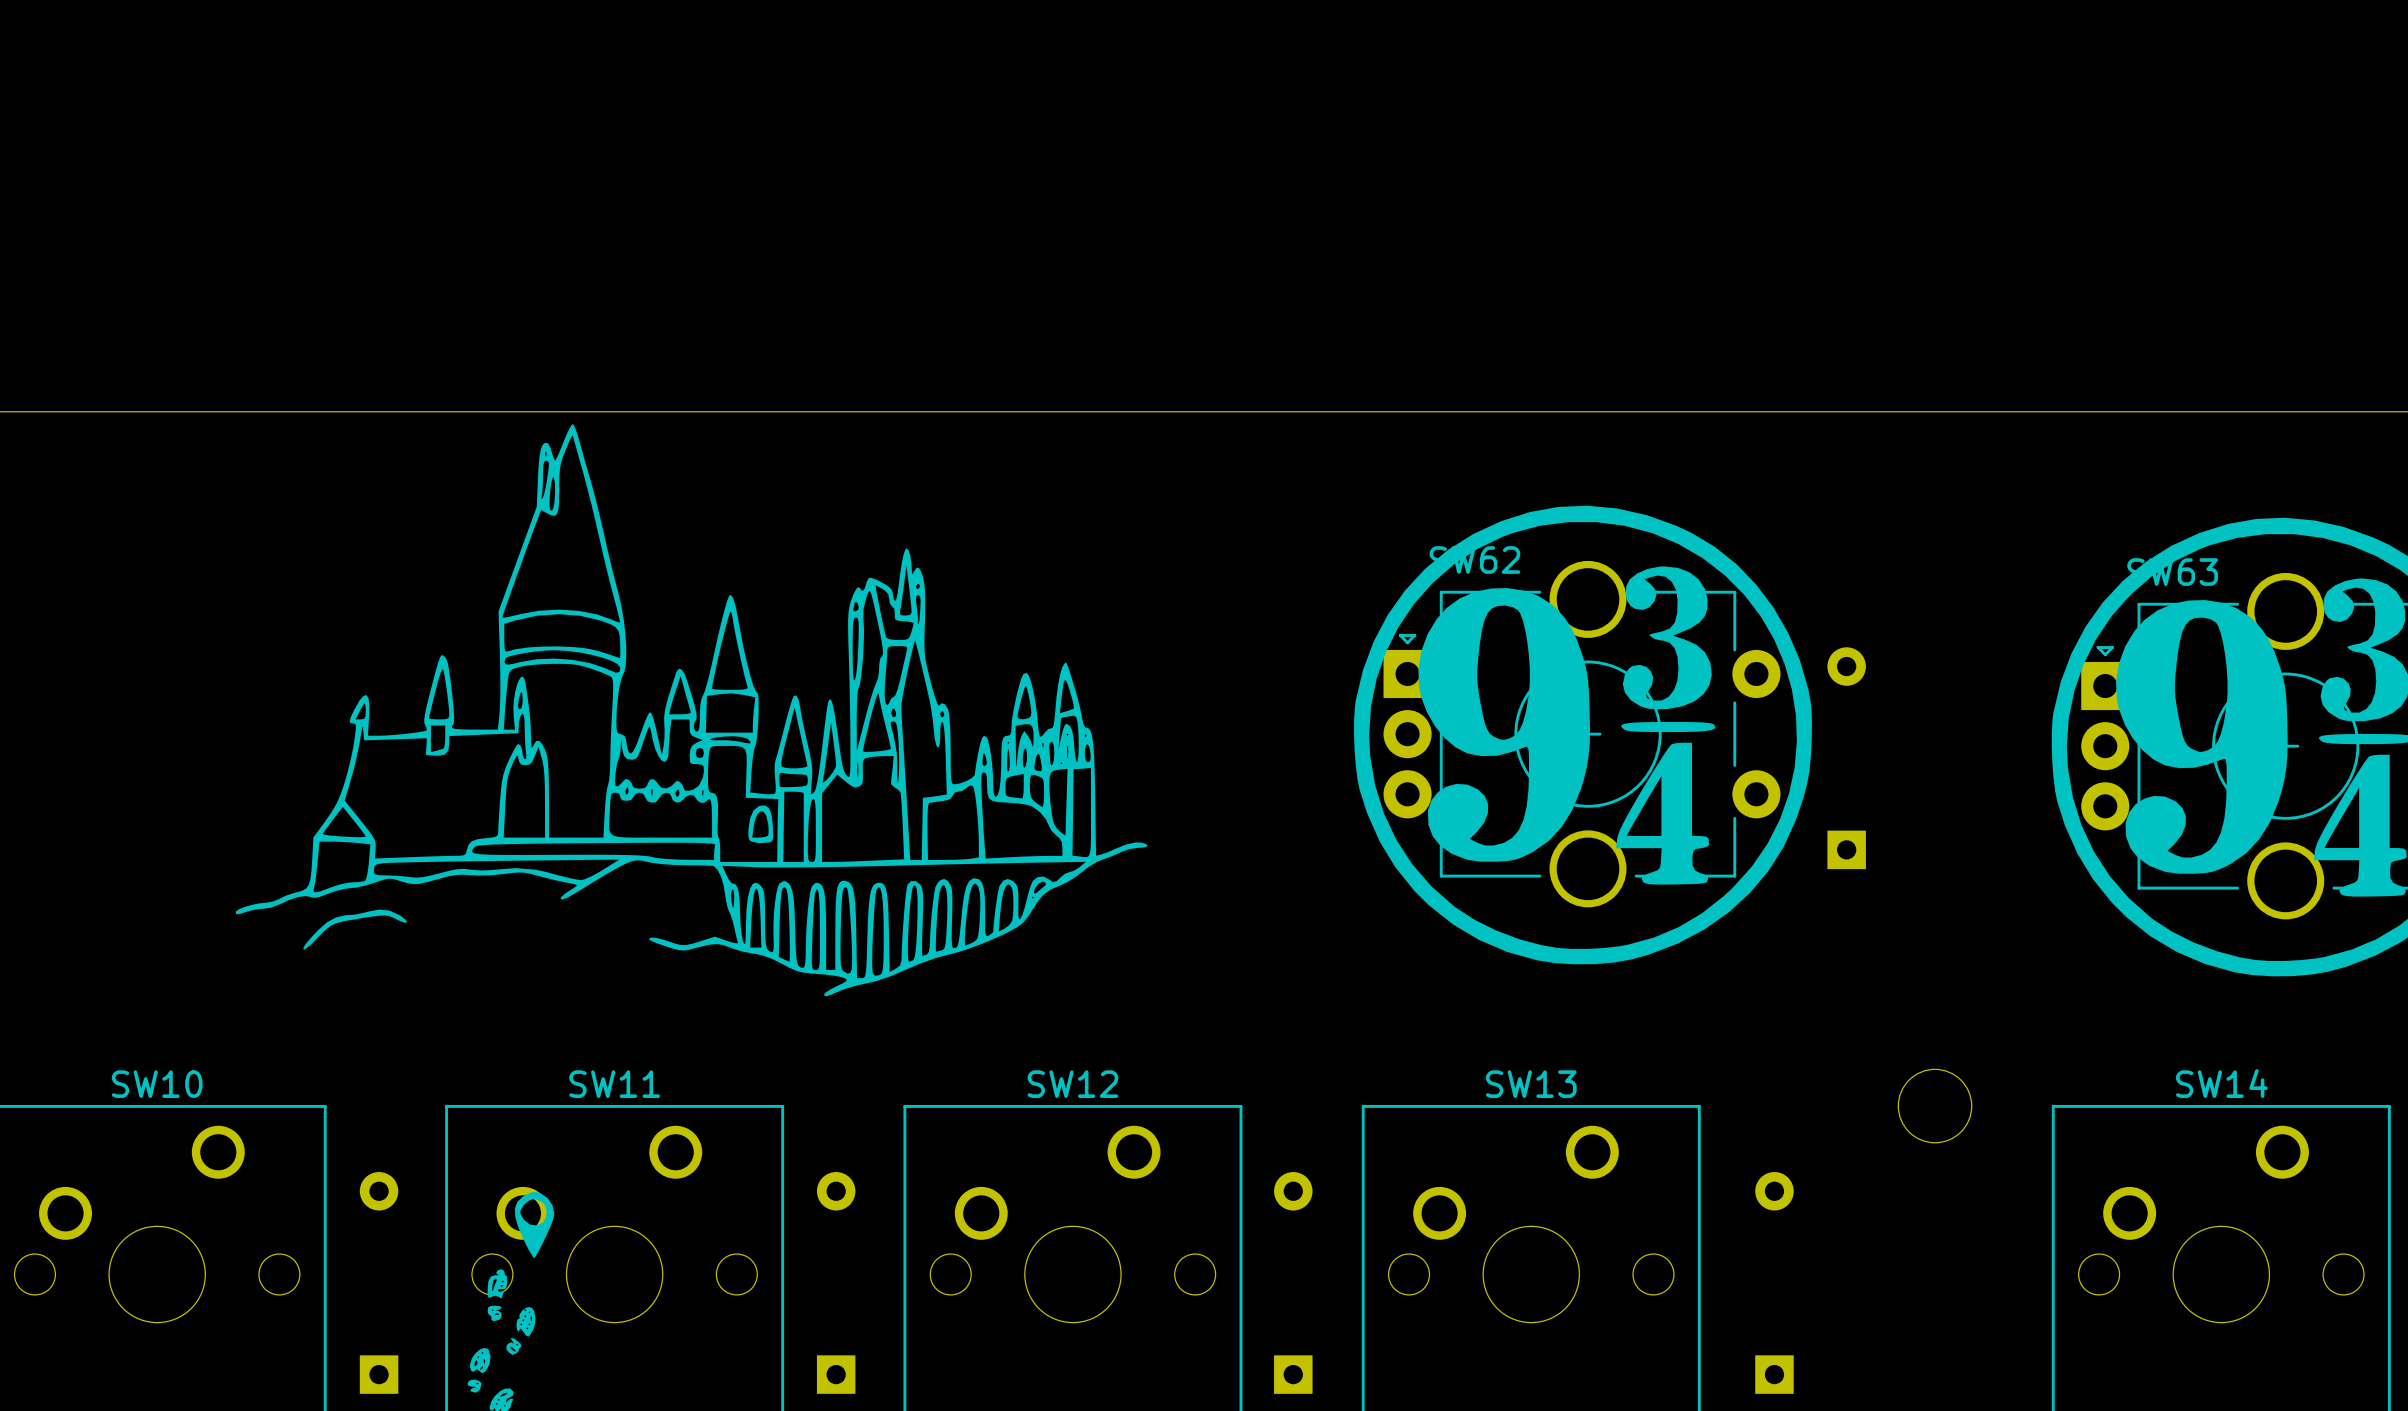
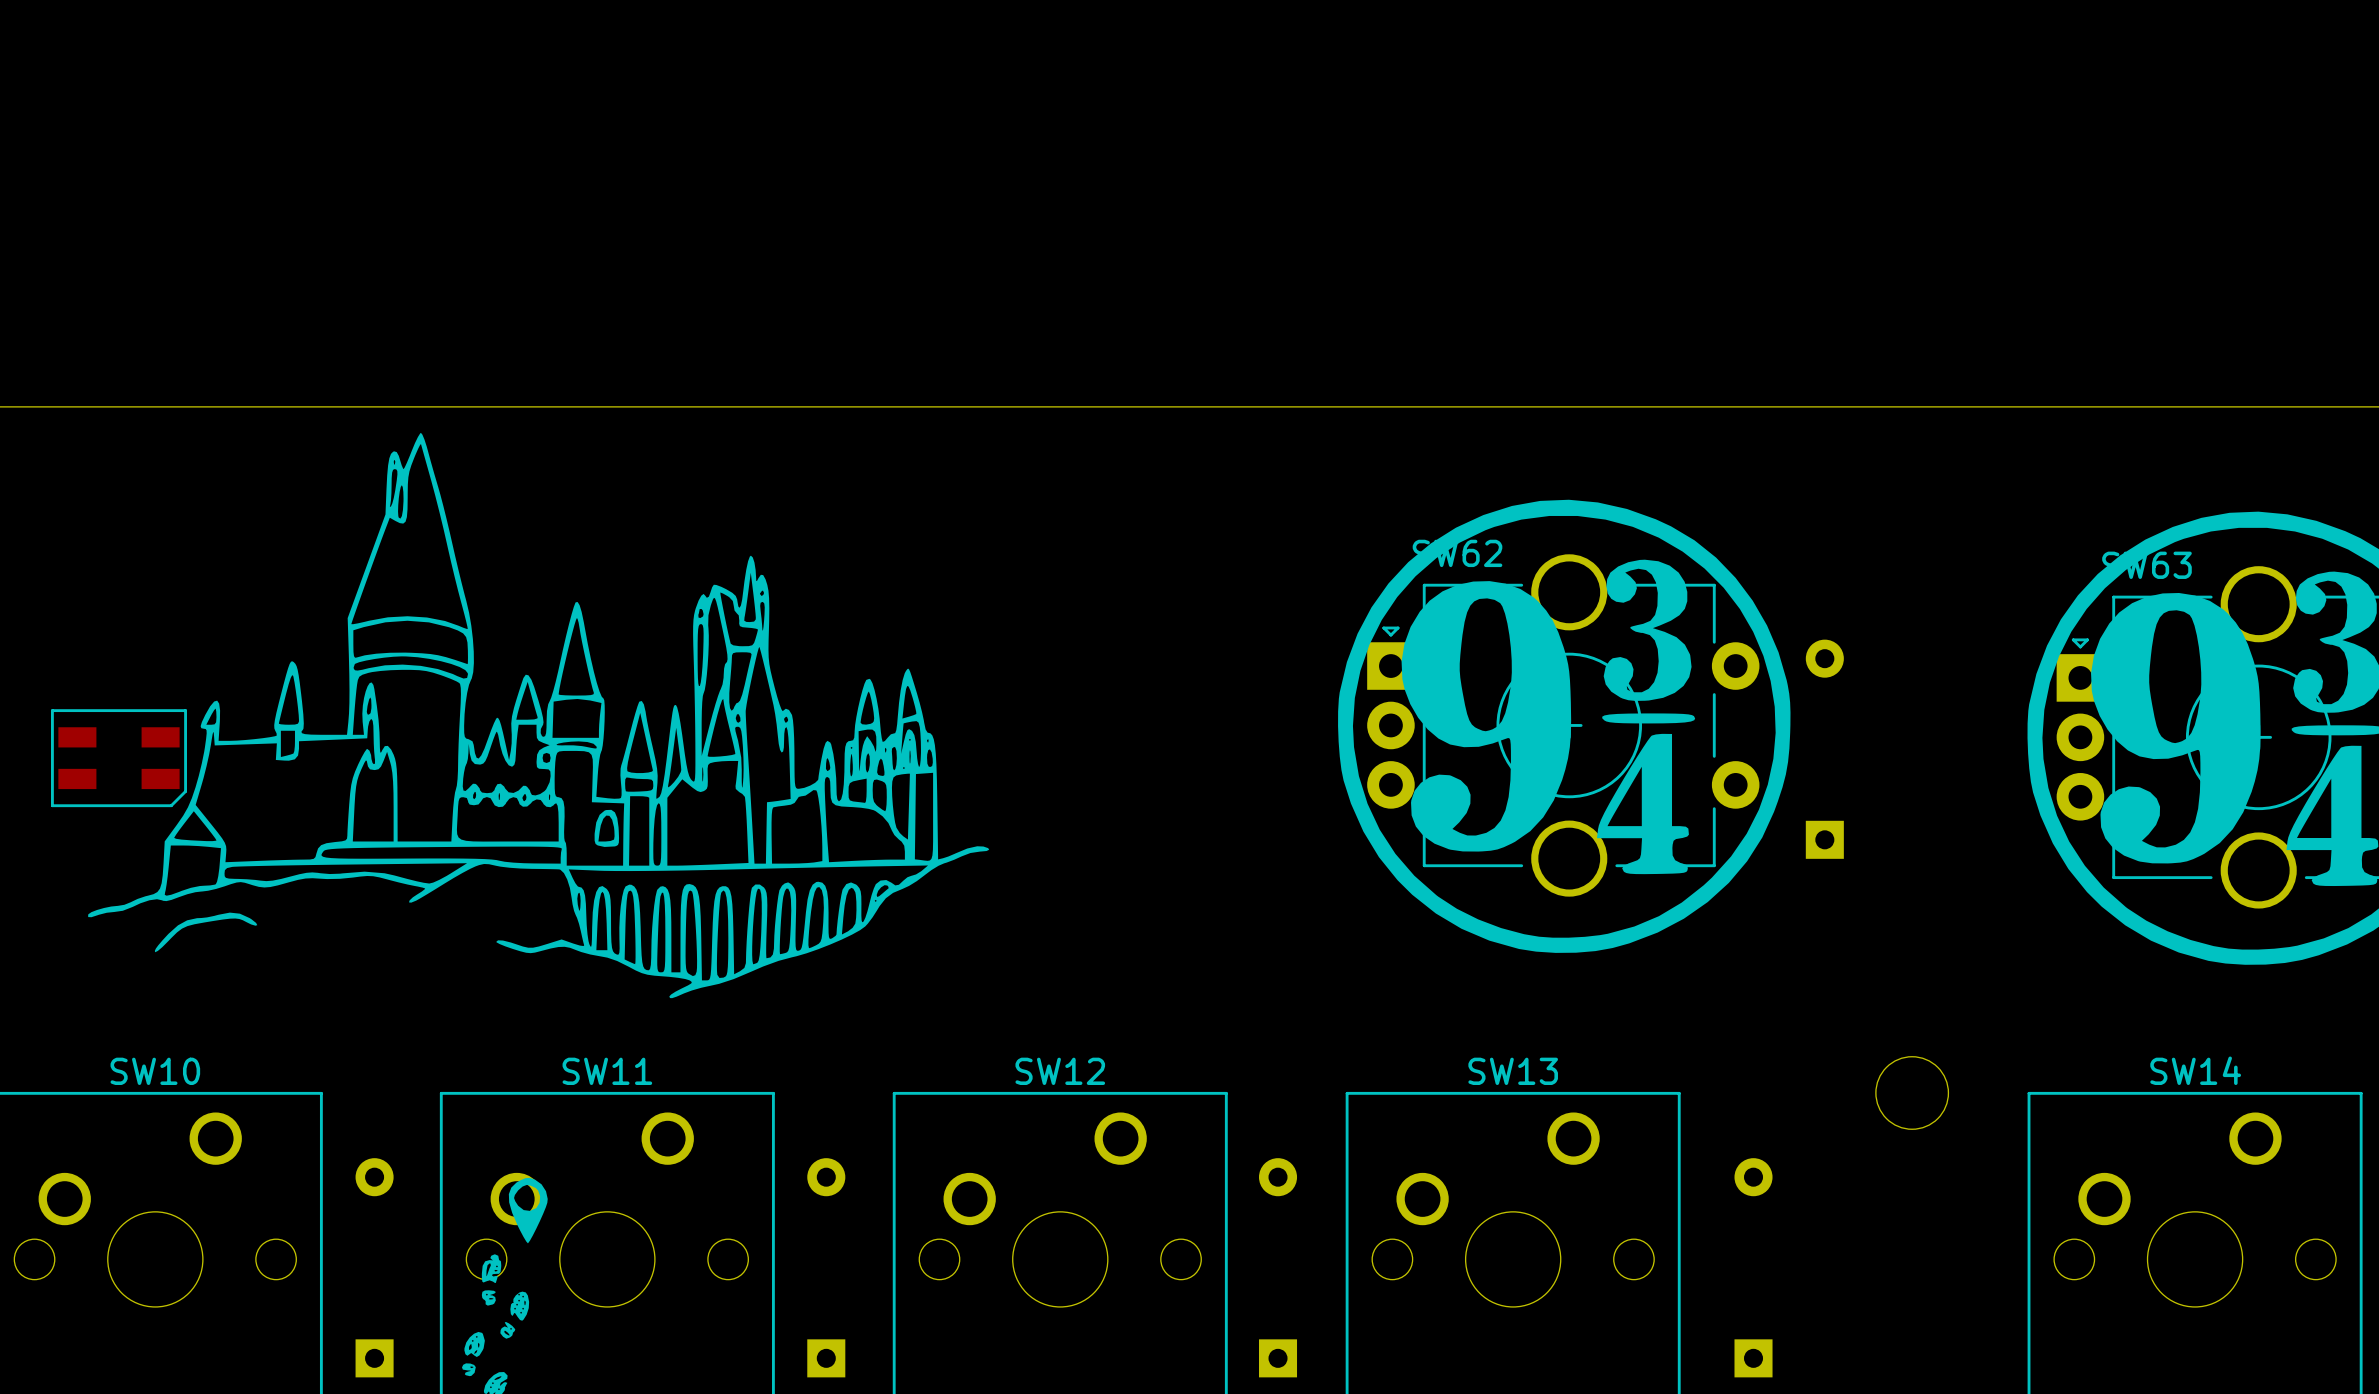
drawing position: (691, 710) -> (538, 715)
part: none -> (118, 758)

